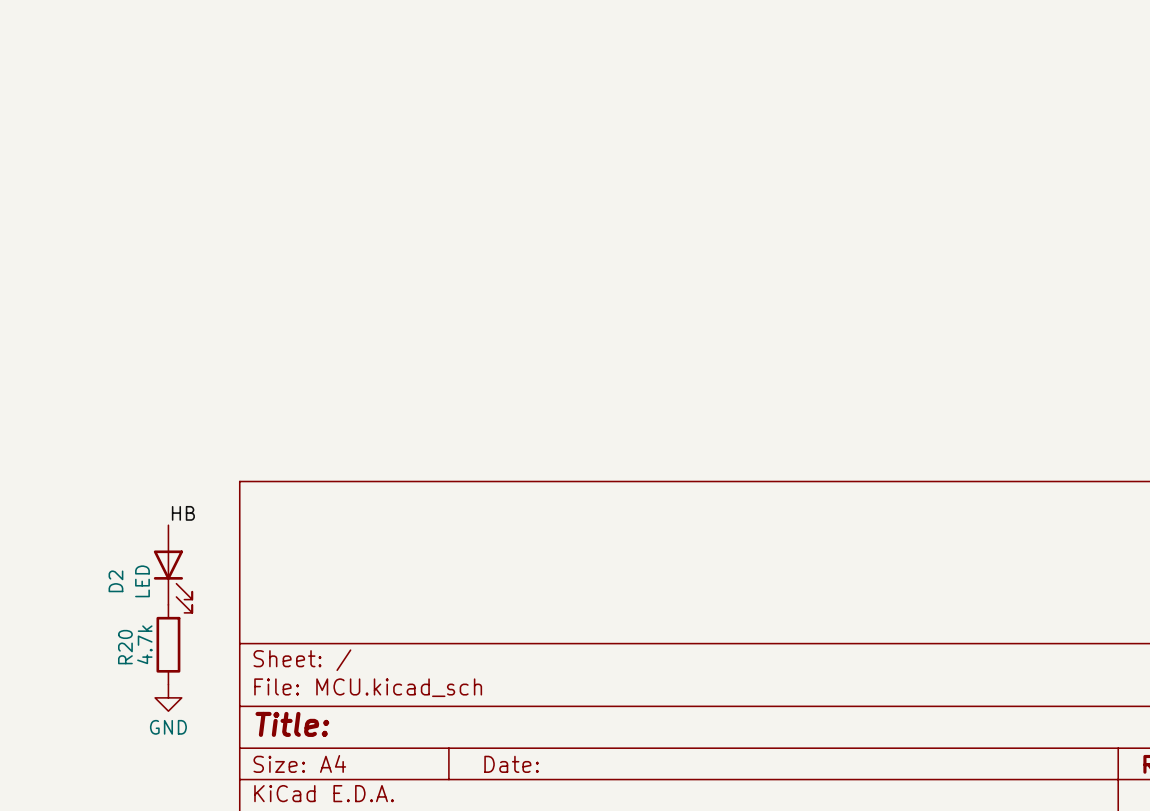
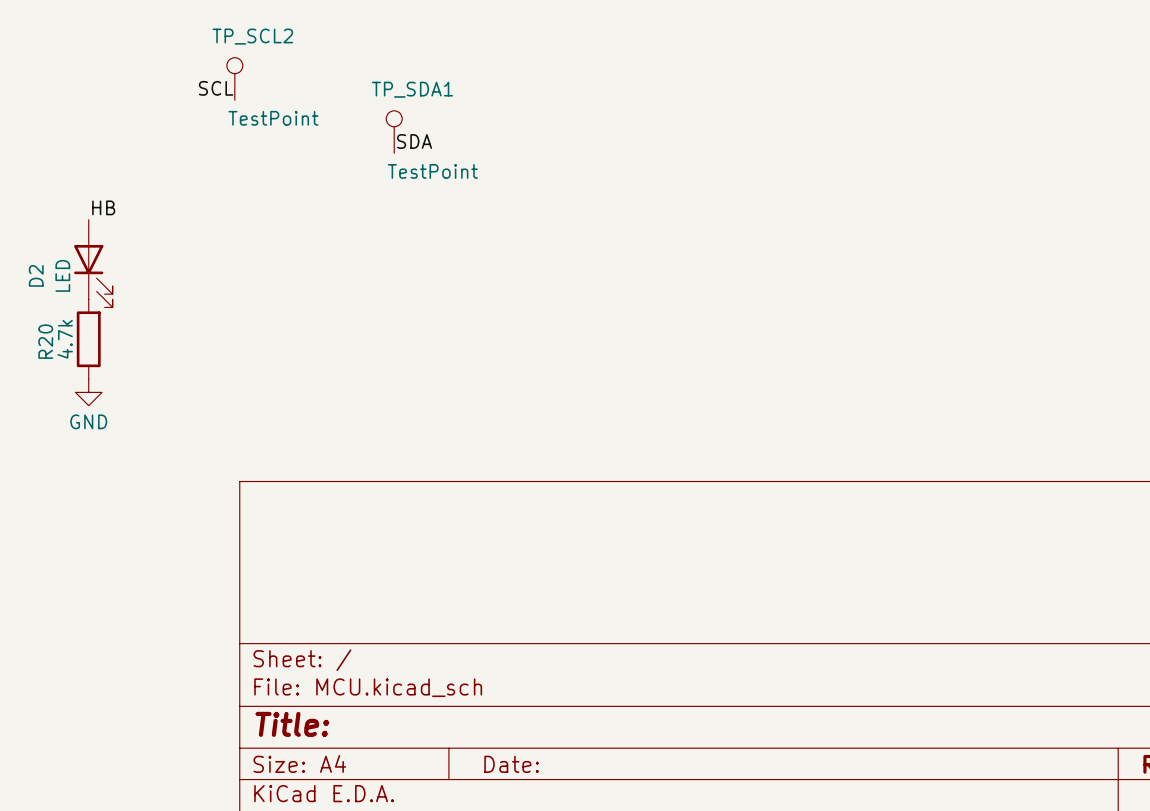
TP_SCL2: none -> TestPoint (234, 78)
label: none -> SCL (216, 88)
TP_SDA1: none -> TestPoint (394, 132)
label: none -> SDA (414, 141)
label: none -> HB (103, 207)
power symbol: none -> GND (88, 392)
label: HB (183, 513) -> none
D2 position: (173, 569) -> (93, 263)
R20 position: (168, 644) -> (88, 339)
power symbol: GND (168, 697) -> none

